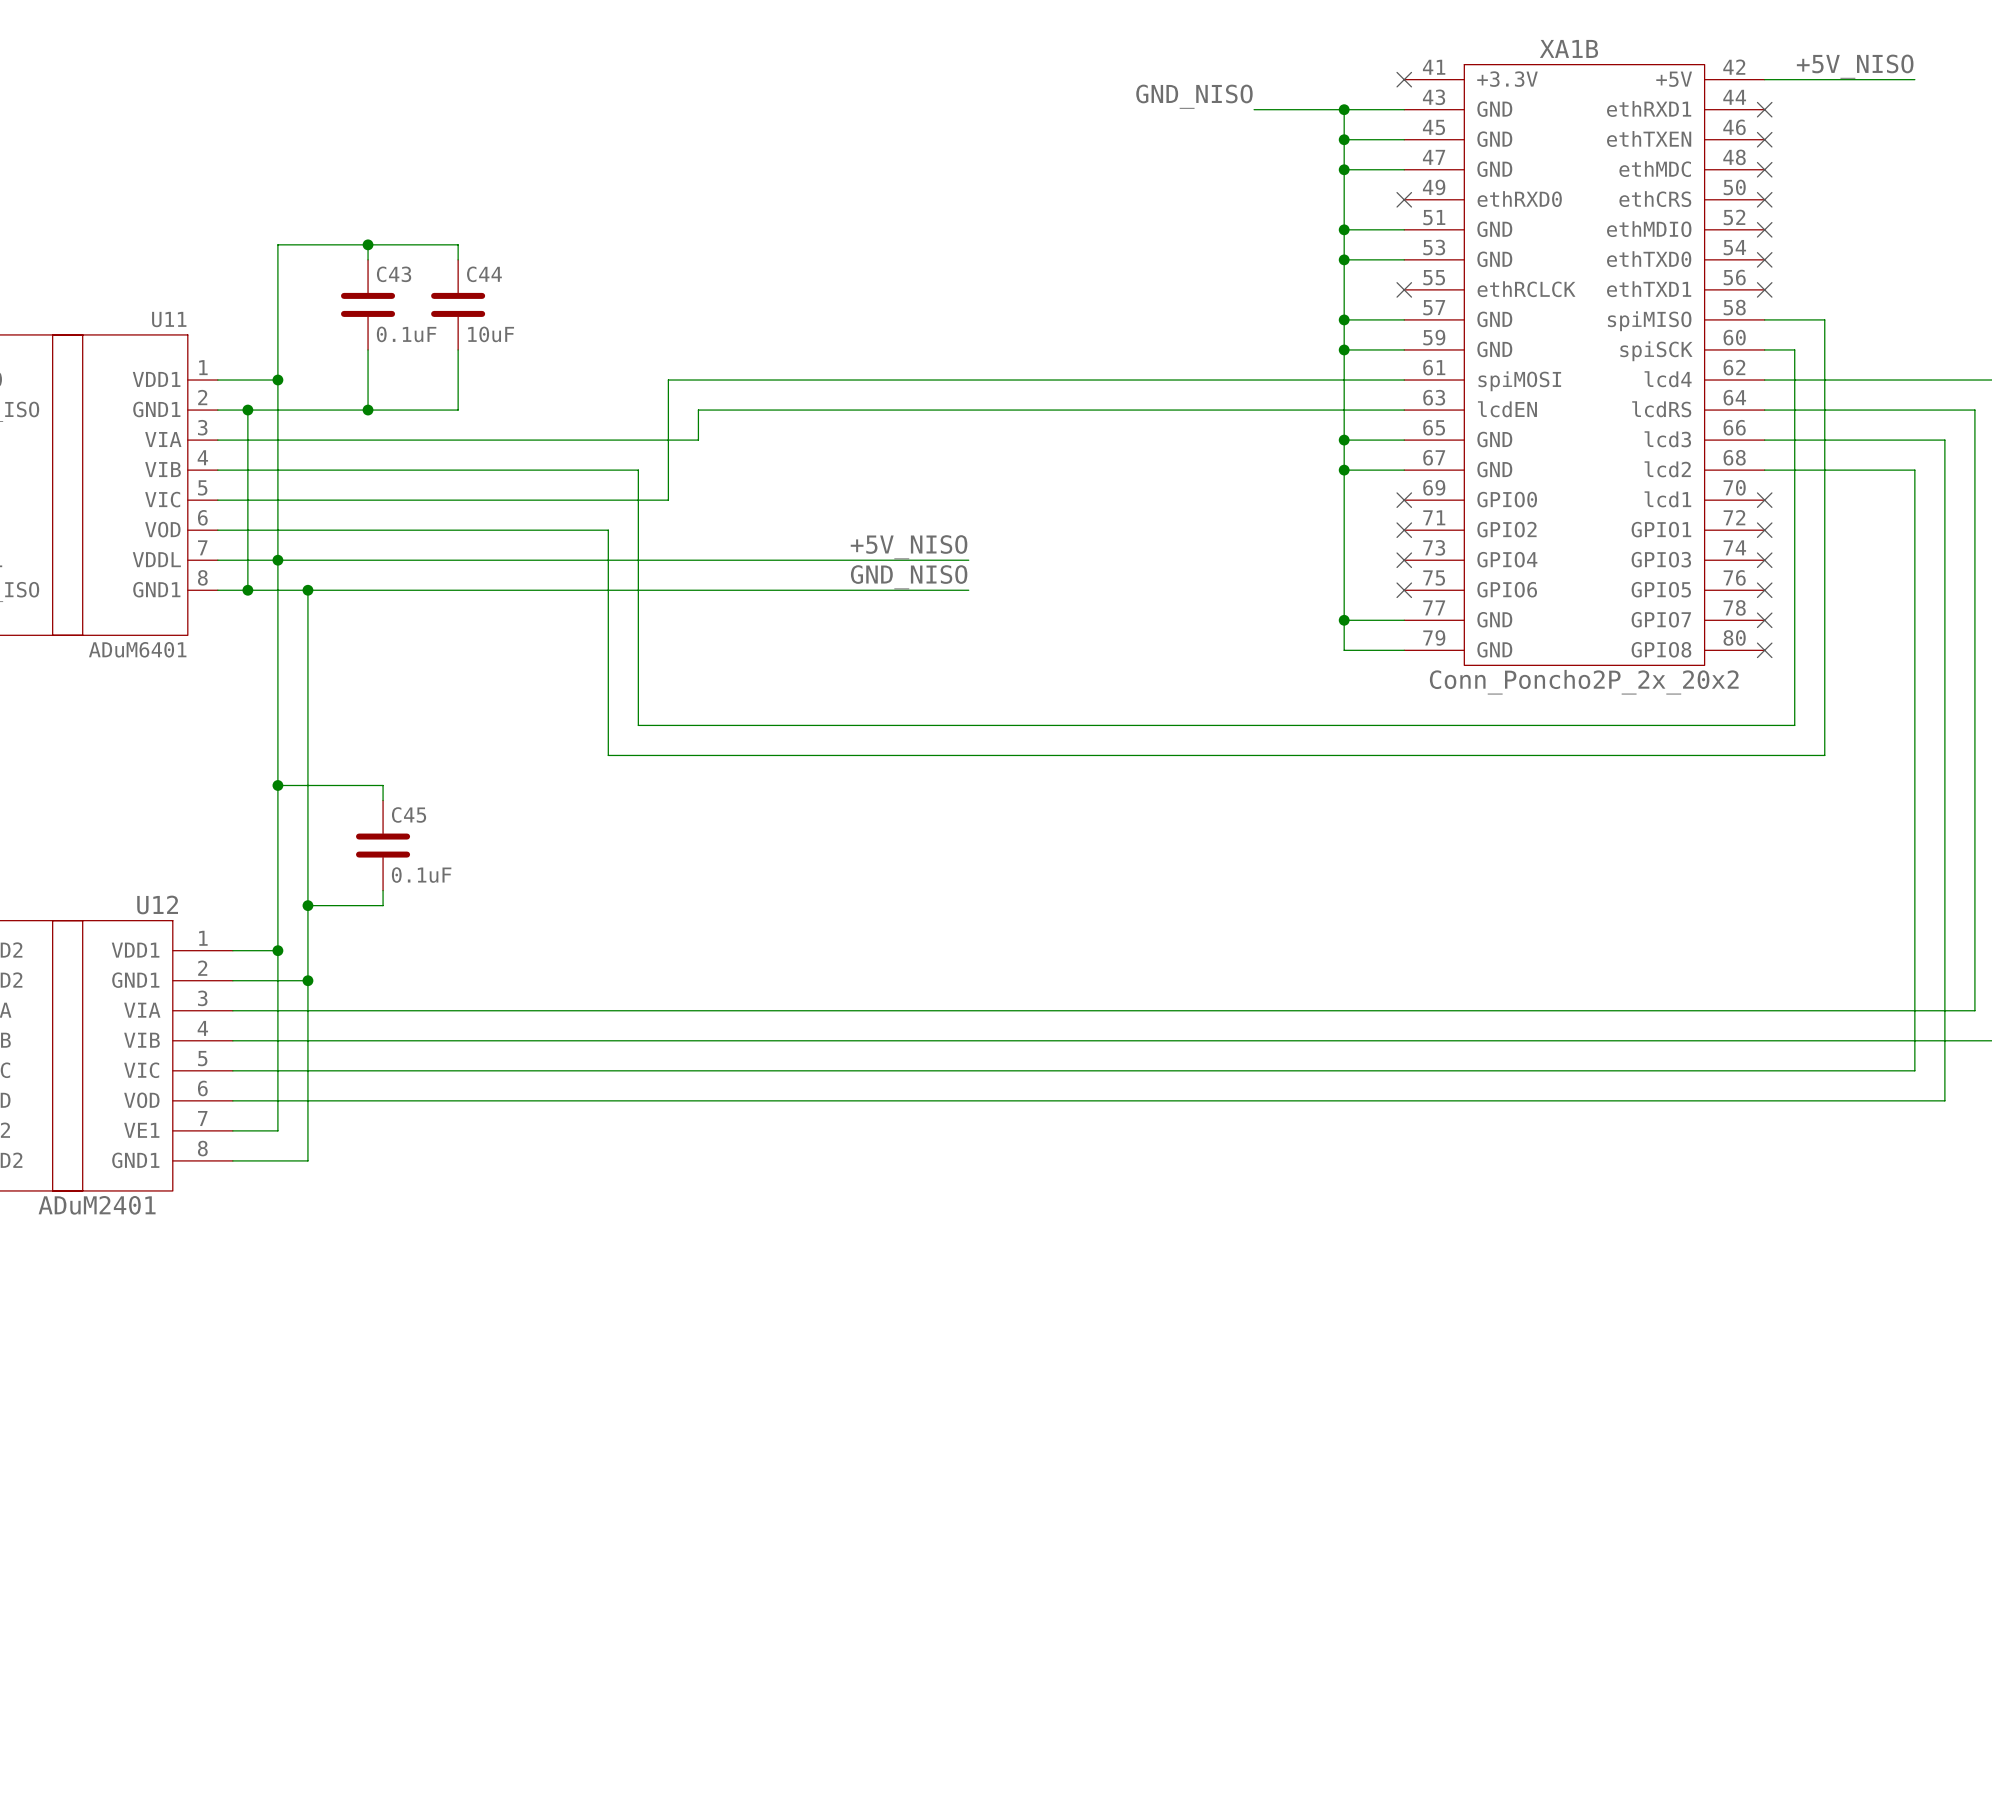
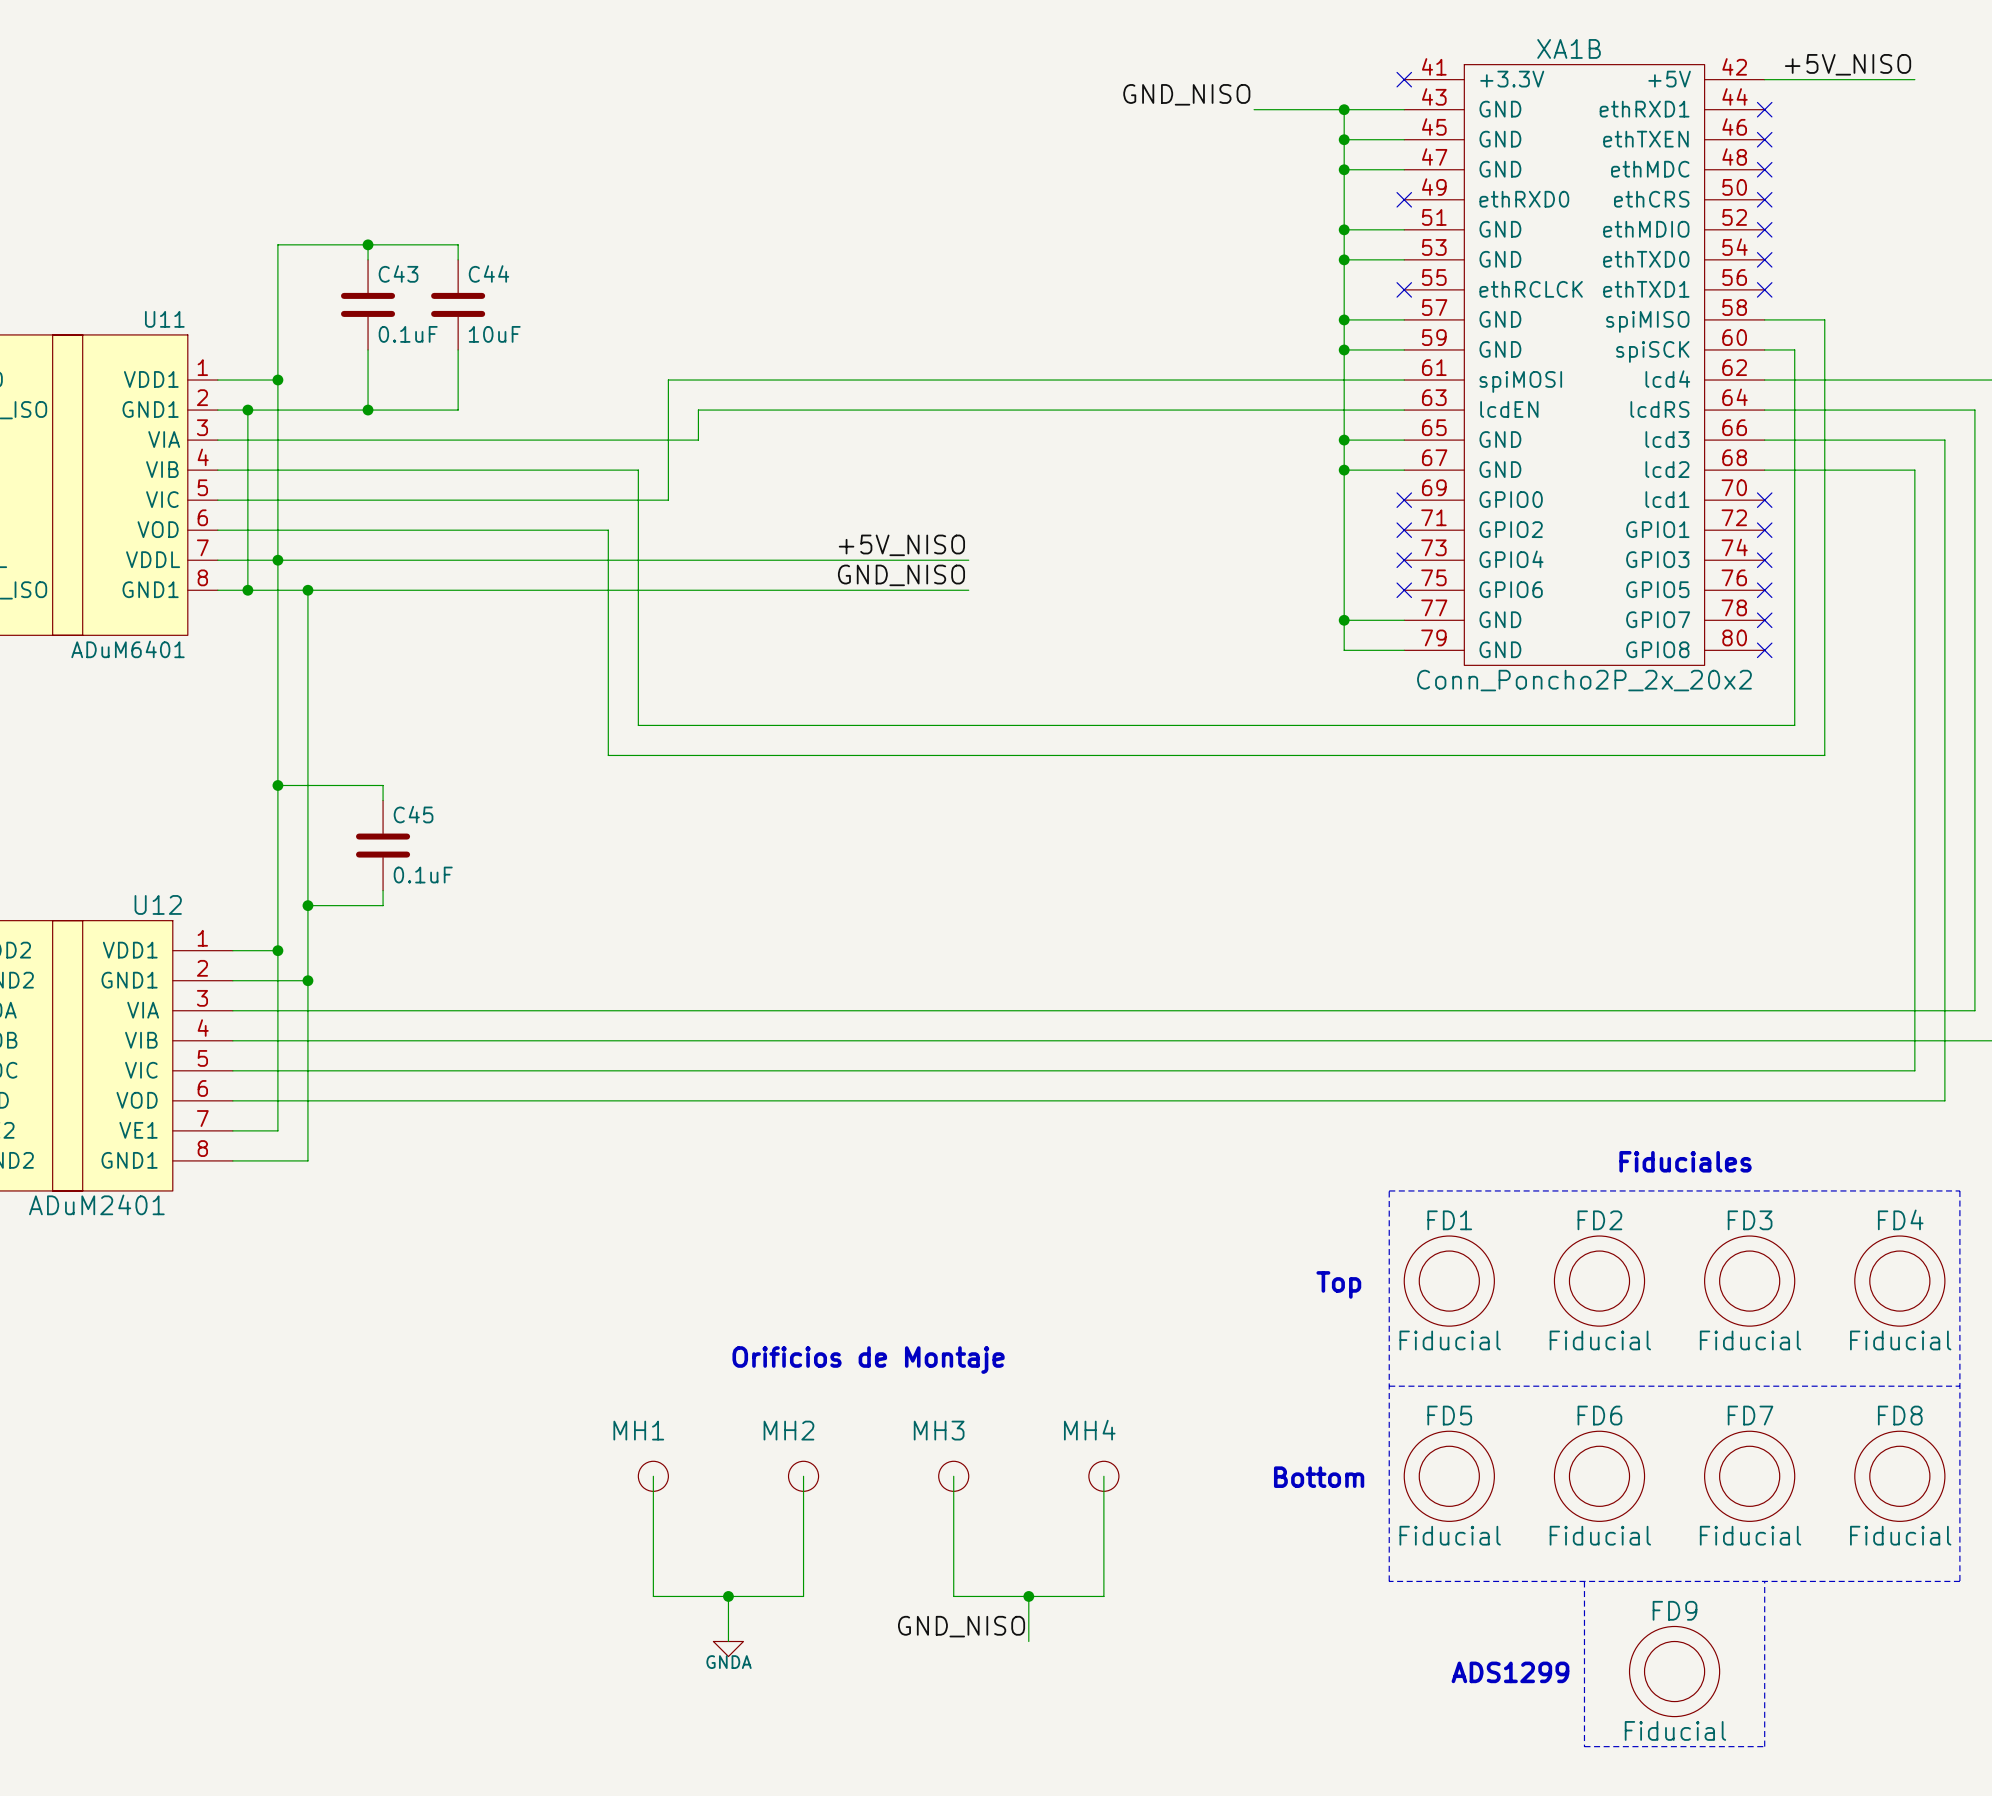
text: none -> Fiduciales (1685, 1161)
line: none -> (1389, 1190) (1959, 1190) (1959, 1581) (1389, 1581) (1389, 1190)
FD1: none -> Fiducial (1449, 1281)
FD2: none -> Fiducial (1599, 1281)
FD3: none -> Fiducial (1749, 1281)
FD4: none -> Fiducial (1899, 1281)
text: none -> Top (1338, 1284)
text: none -> Orificios de Montaje (868, 1360)
line: none -> (1389, 1386) (1959, 1386)
wire: none -> (653, 1476) (653, 1596) (803, 1596) (803, 1476)
MH1: none -> (653, 1476)
MH2: none -> (803, 1476)
wire: none -> (953, 1476) (953, 1596) (1103, 1596) (1103, 1476)
MH3: none -> (953, 1476)
MH4: none -> (1103, 1476)
FD5: none -> Fiducial (1449, 1476)
FD6: none -> Fiducial (1599, 1476)
FD7: none -> Fiducial (1749, 1476)
FD8: none -> Fiducial (1899, 1476)
text: none -> Bottom (1319, 1477)
line: none -> (1584, 1581) (1584, 1746) (1764, 1746) (1764, 1581)
wire: none -> (728, 1596) (728, 1641)
junction: none -> (728, 1596)
wire: none -> (1028, 1596) (1028, 1641)
junction: none -> (1028, 1596)
label: none -> GND_NISO (961, 1626)
power symbol: none -> GNDA (728, 1649)
FD9: none -> Fiducial (1674, 1671)
text: none -> ADS1299 (1510, 1672)

